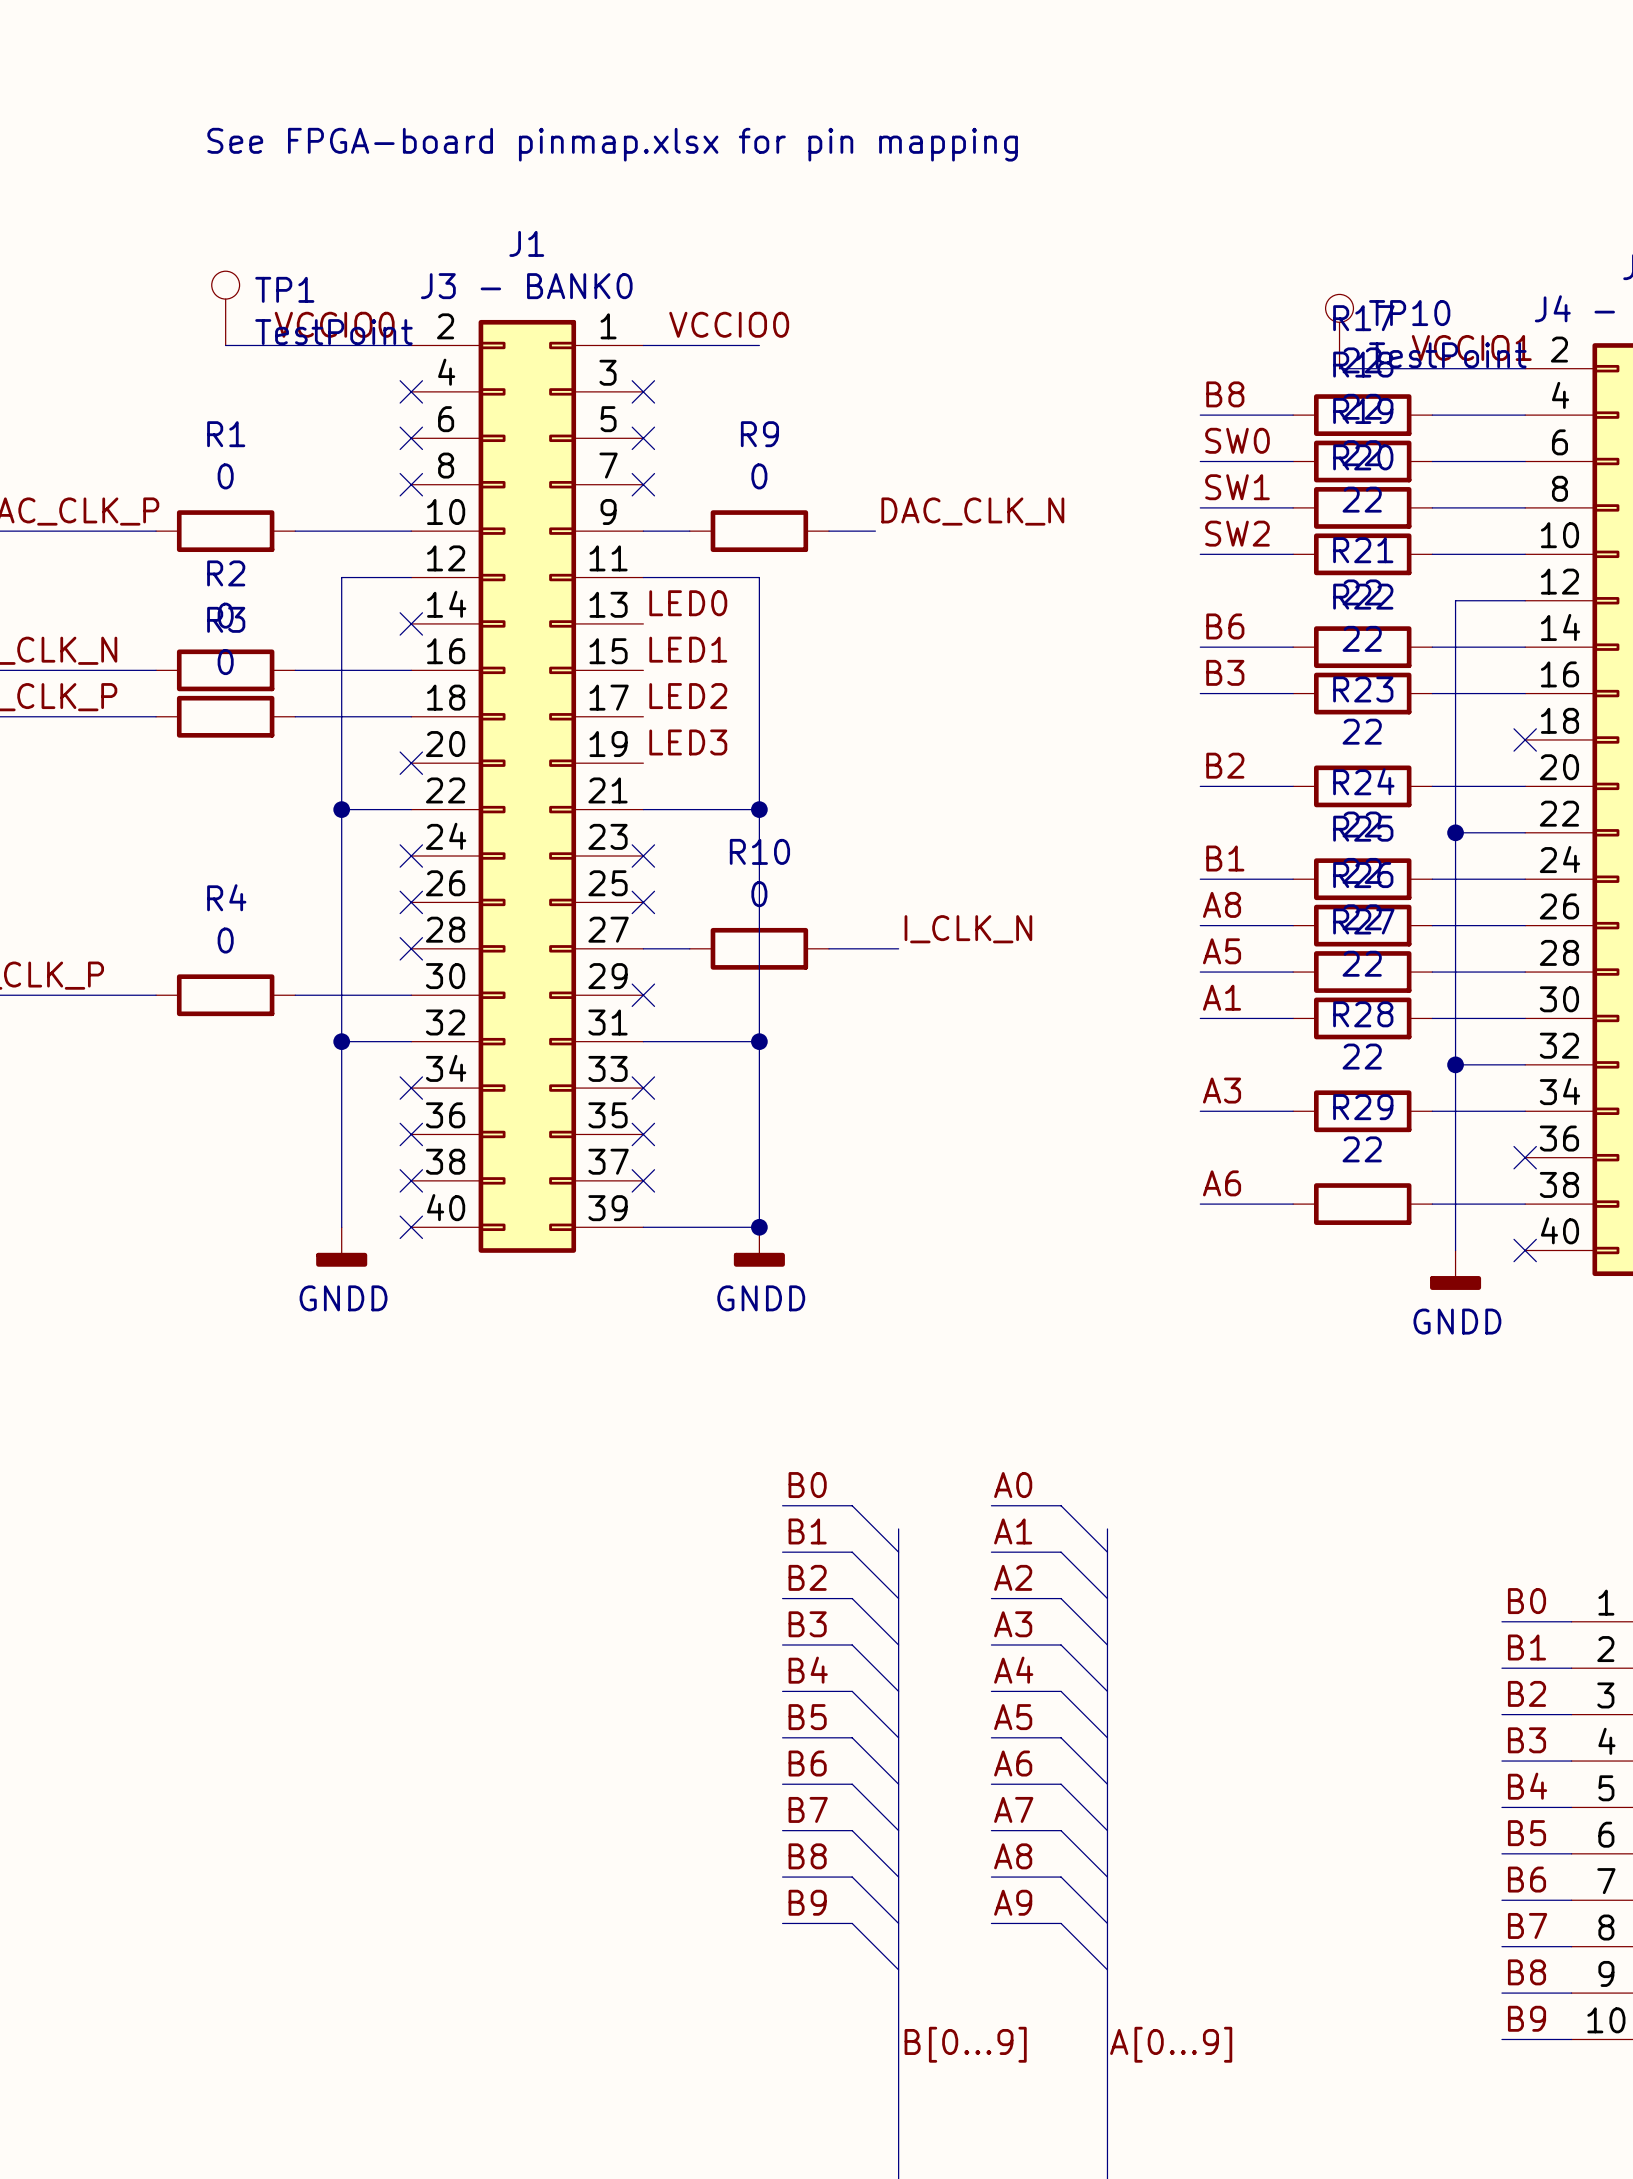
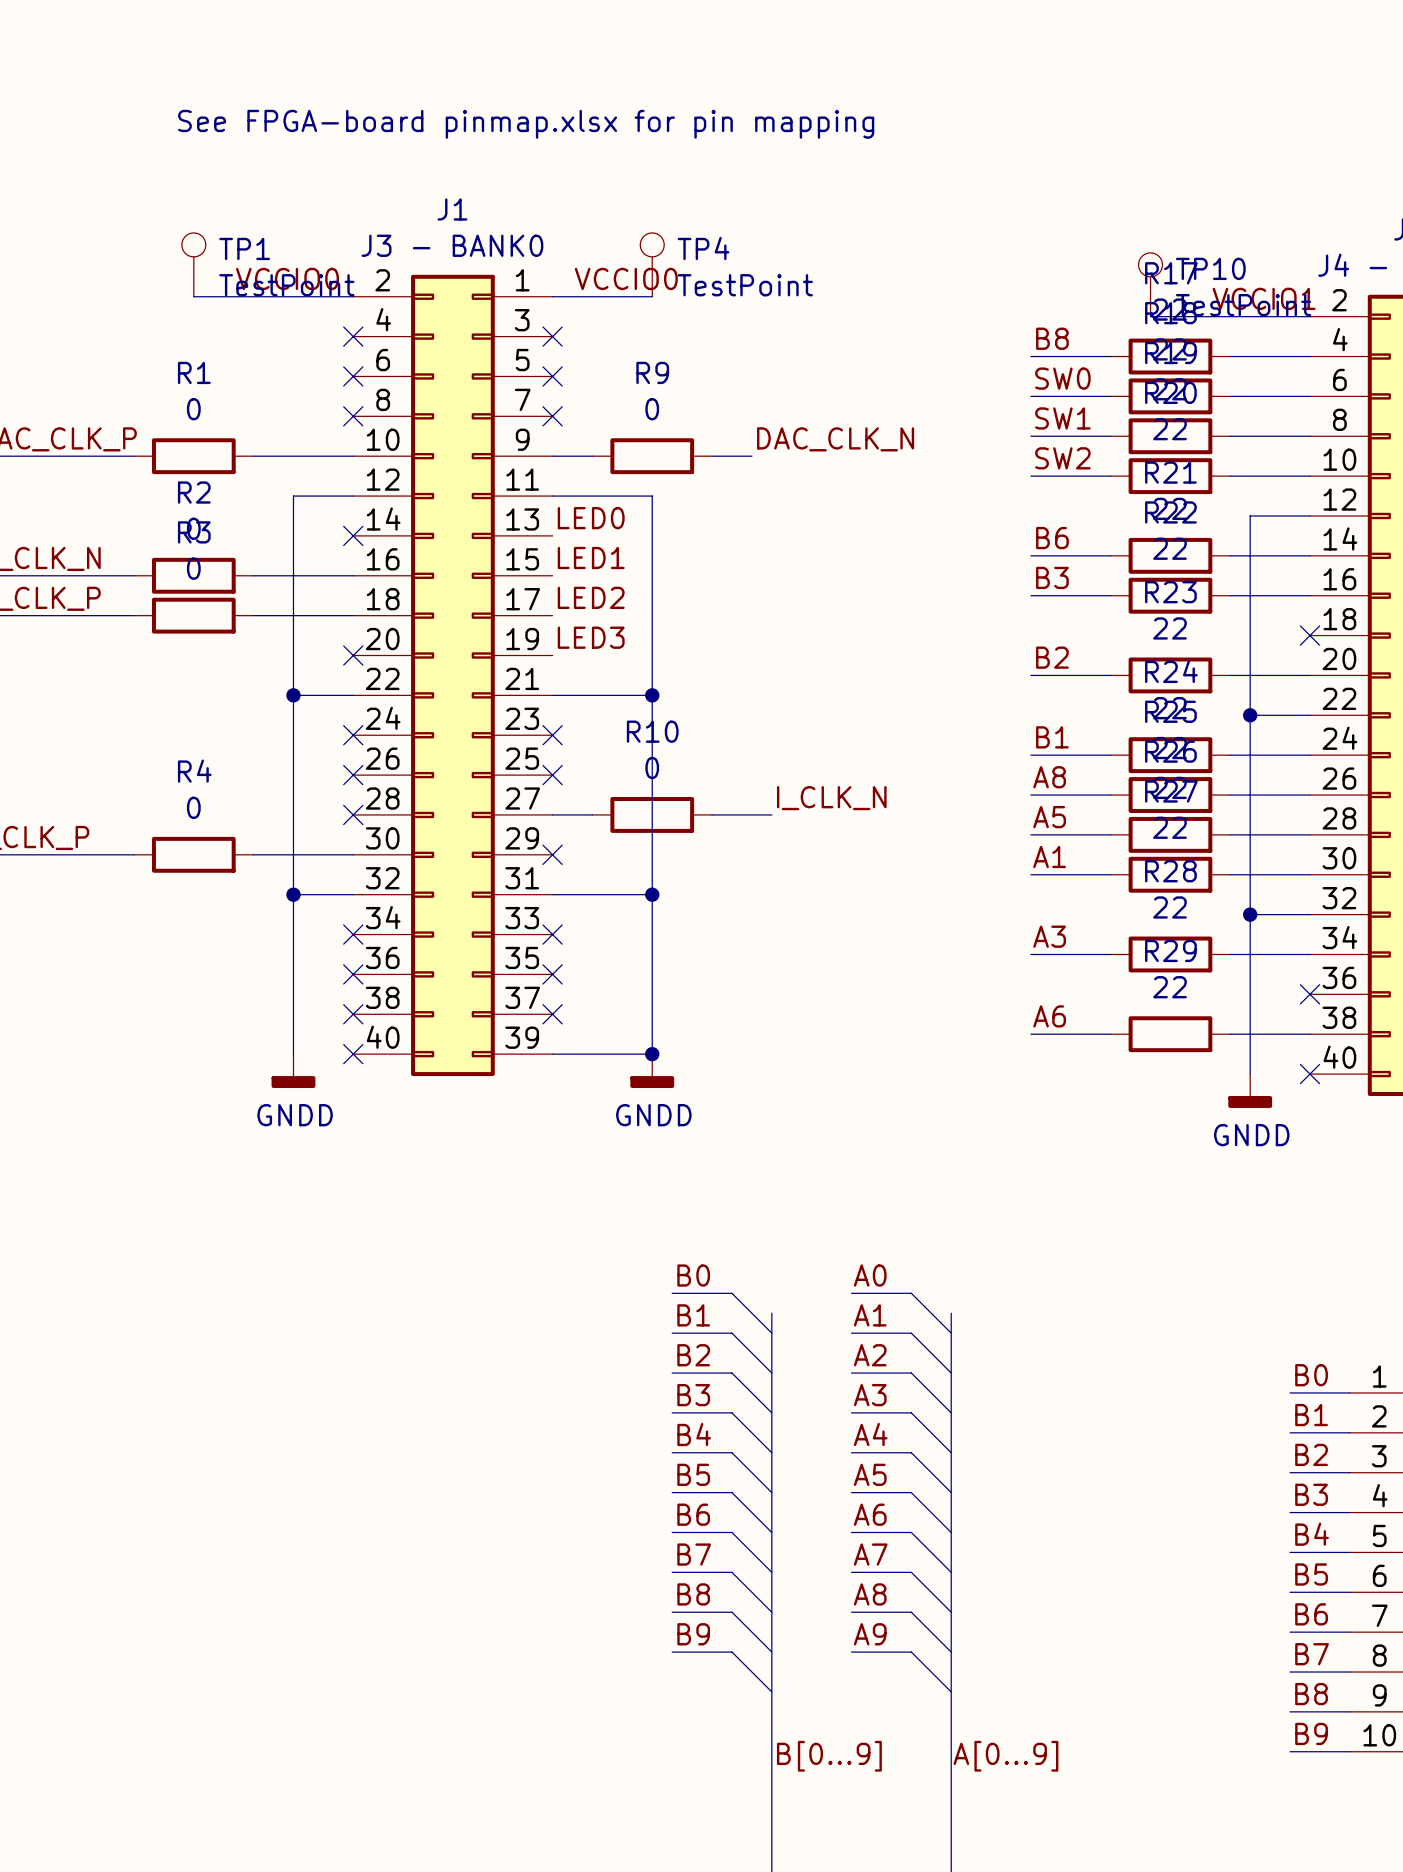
TP4: none -> TestPoint (652, 264)

